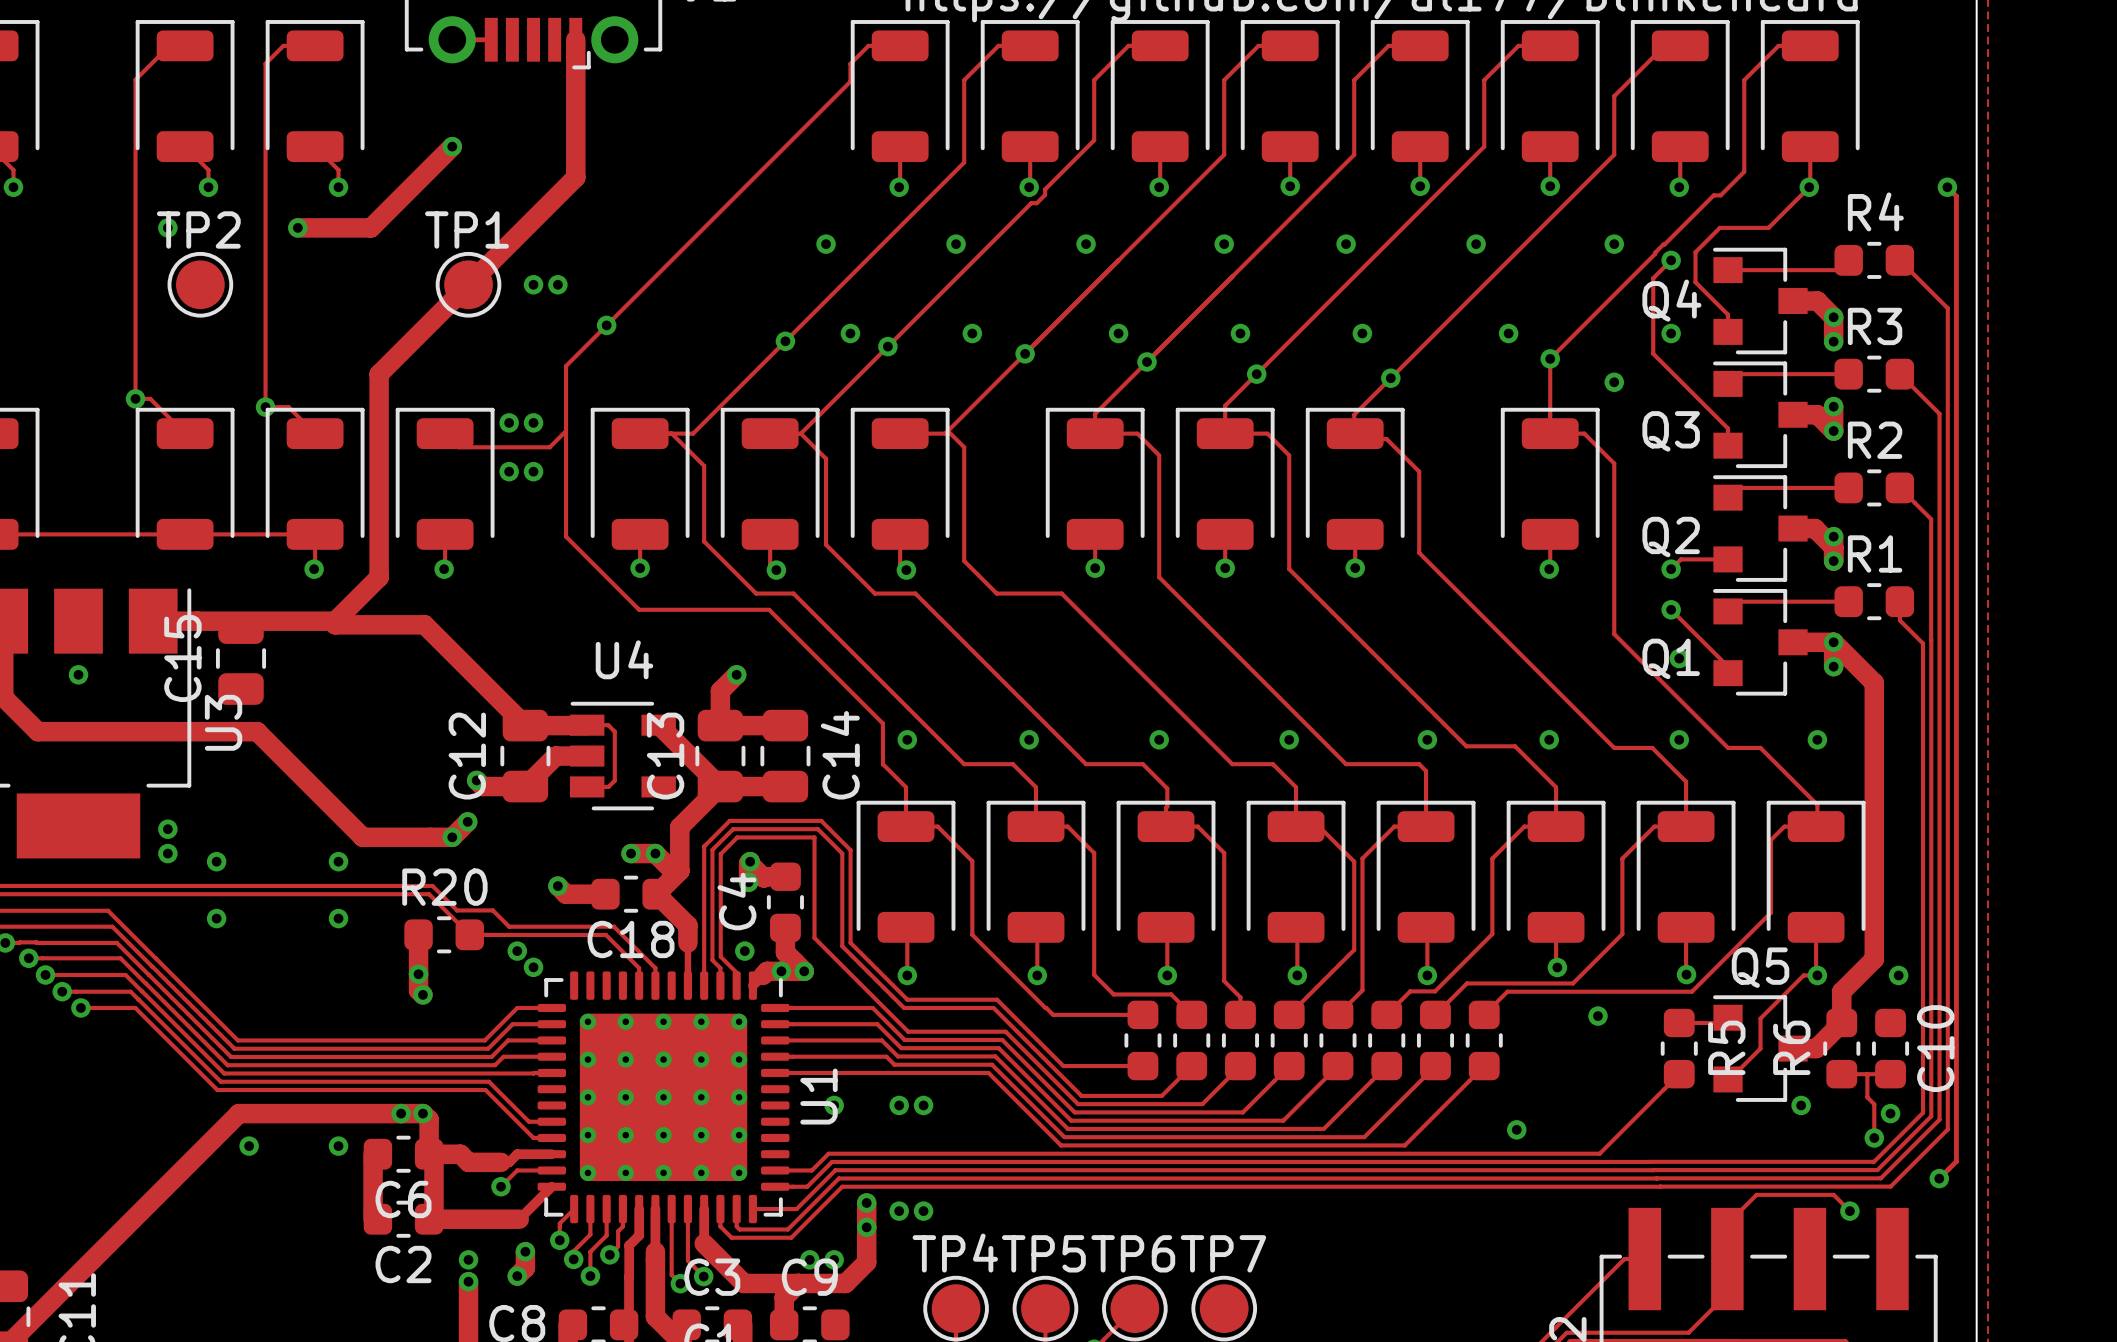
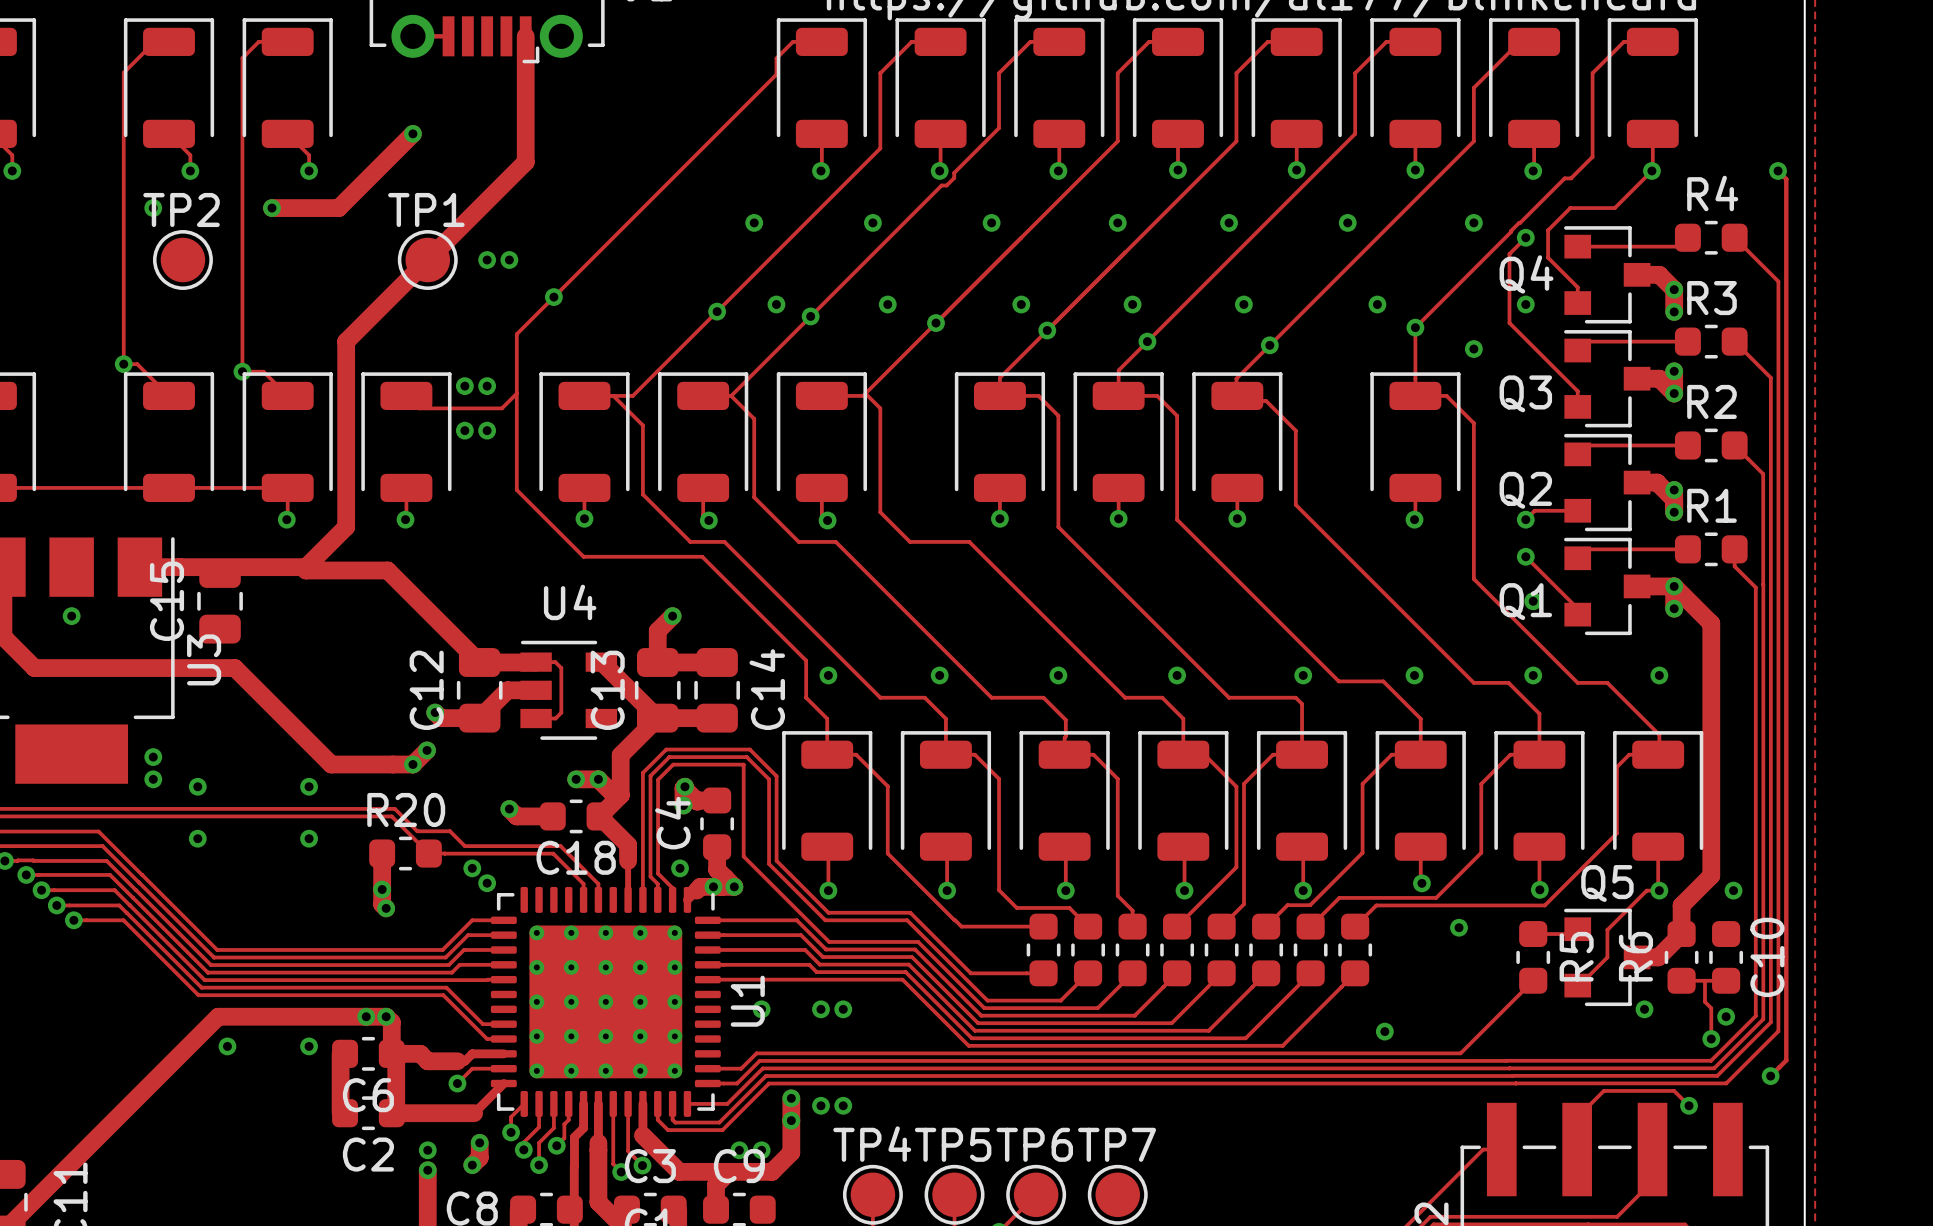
track: (1727, 1293) (1688, 1332) -> (1652, 1181) (1617, 1216) (1541, 1216)

